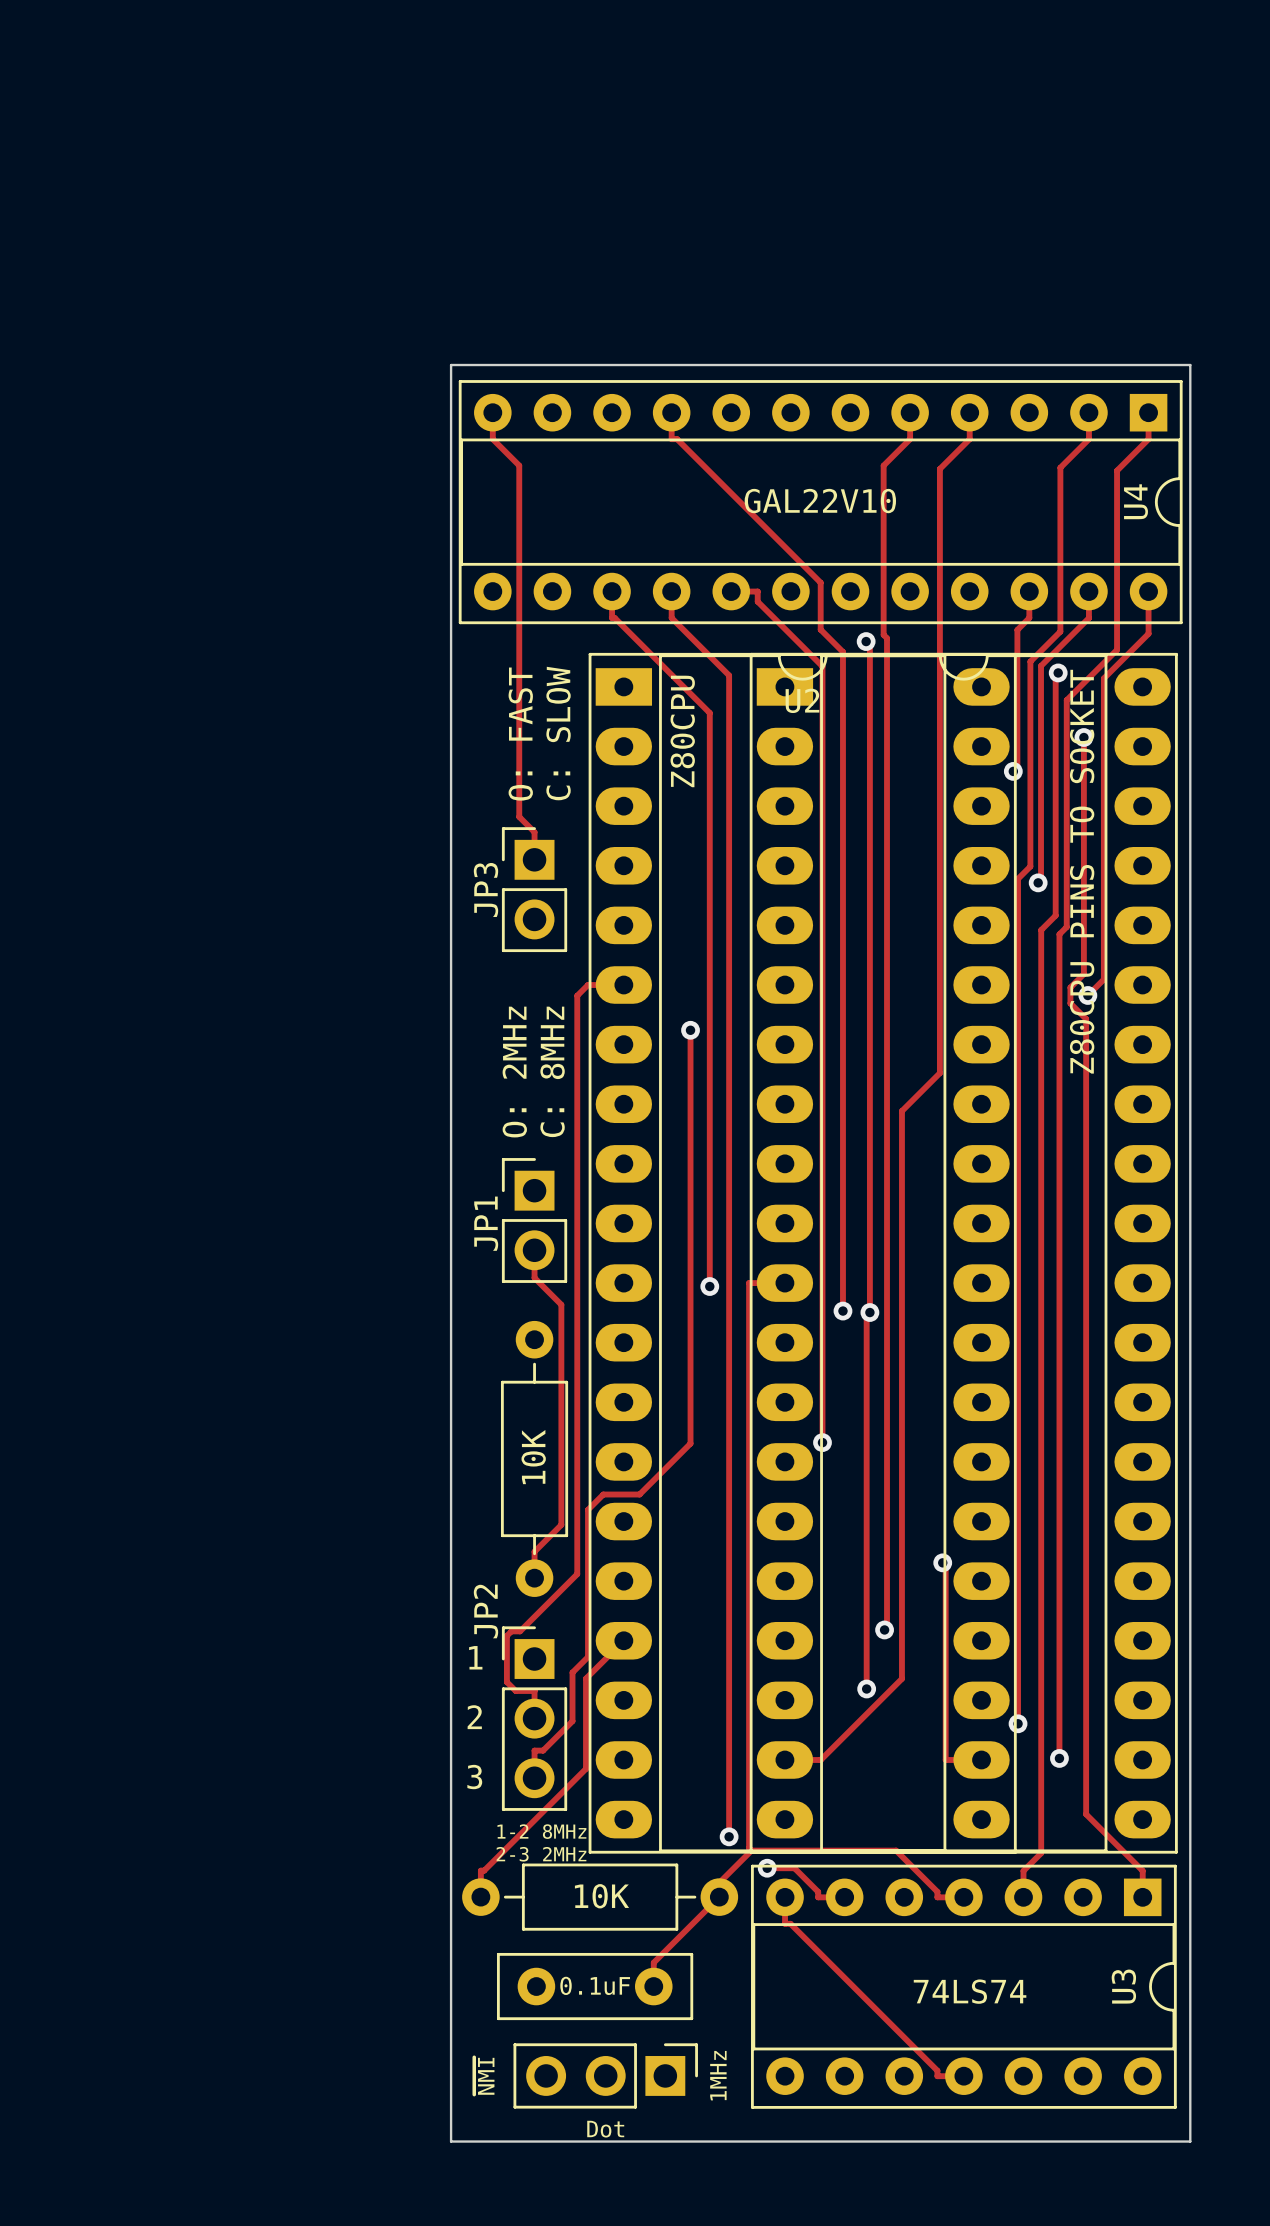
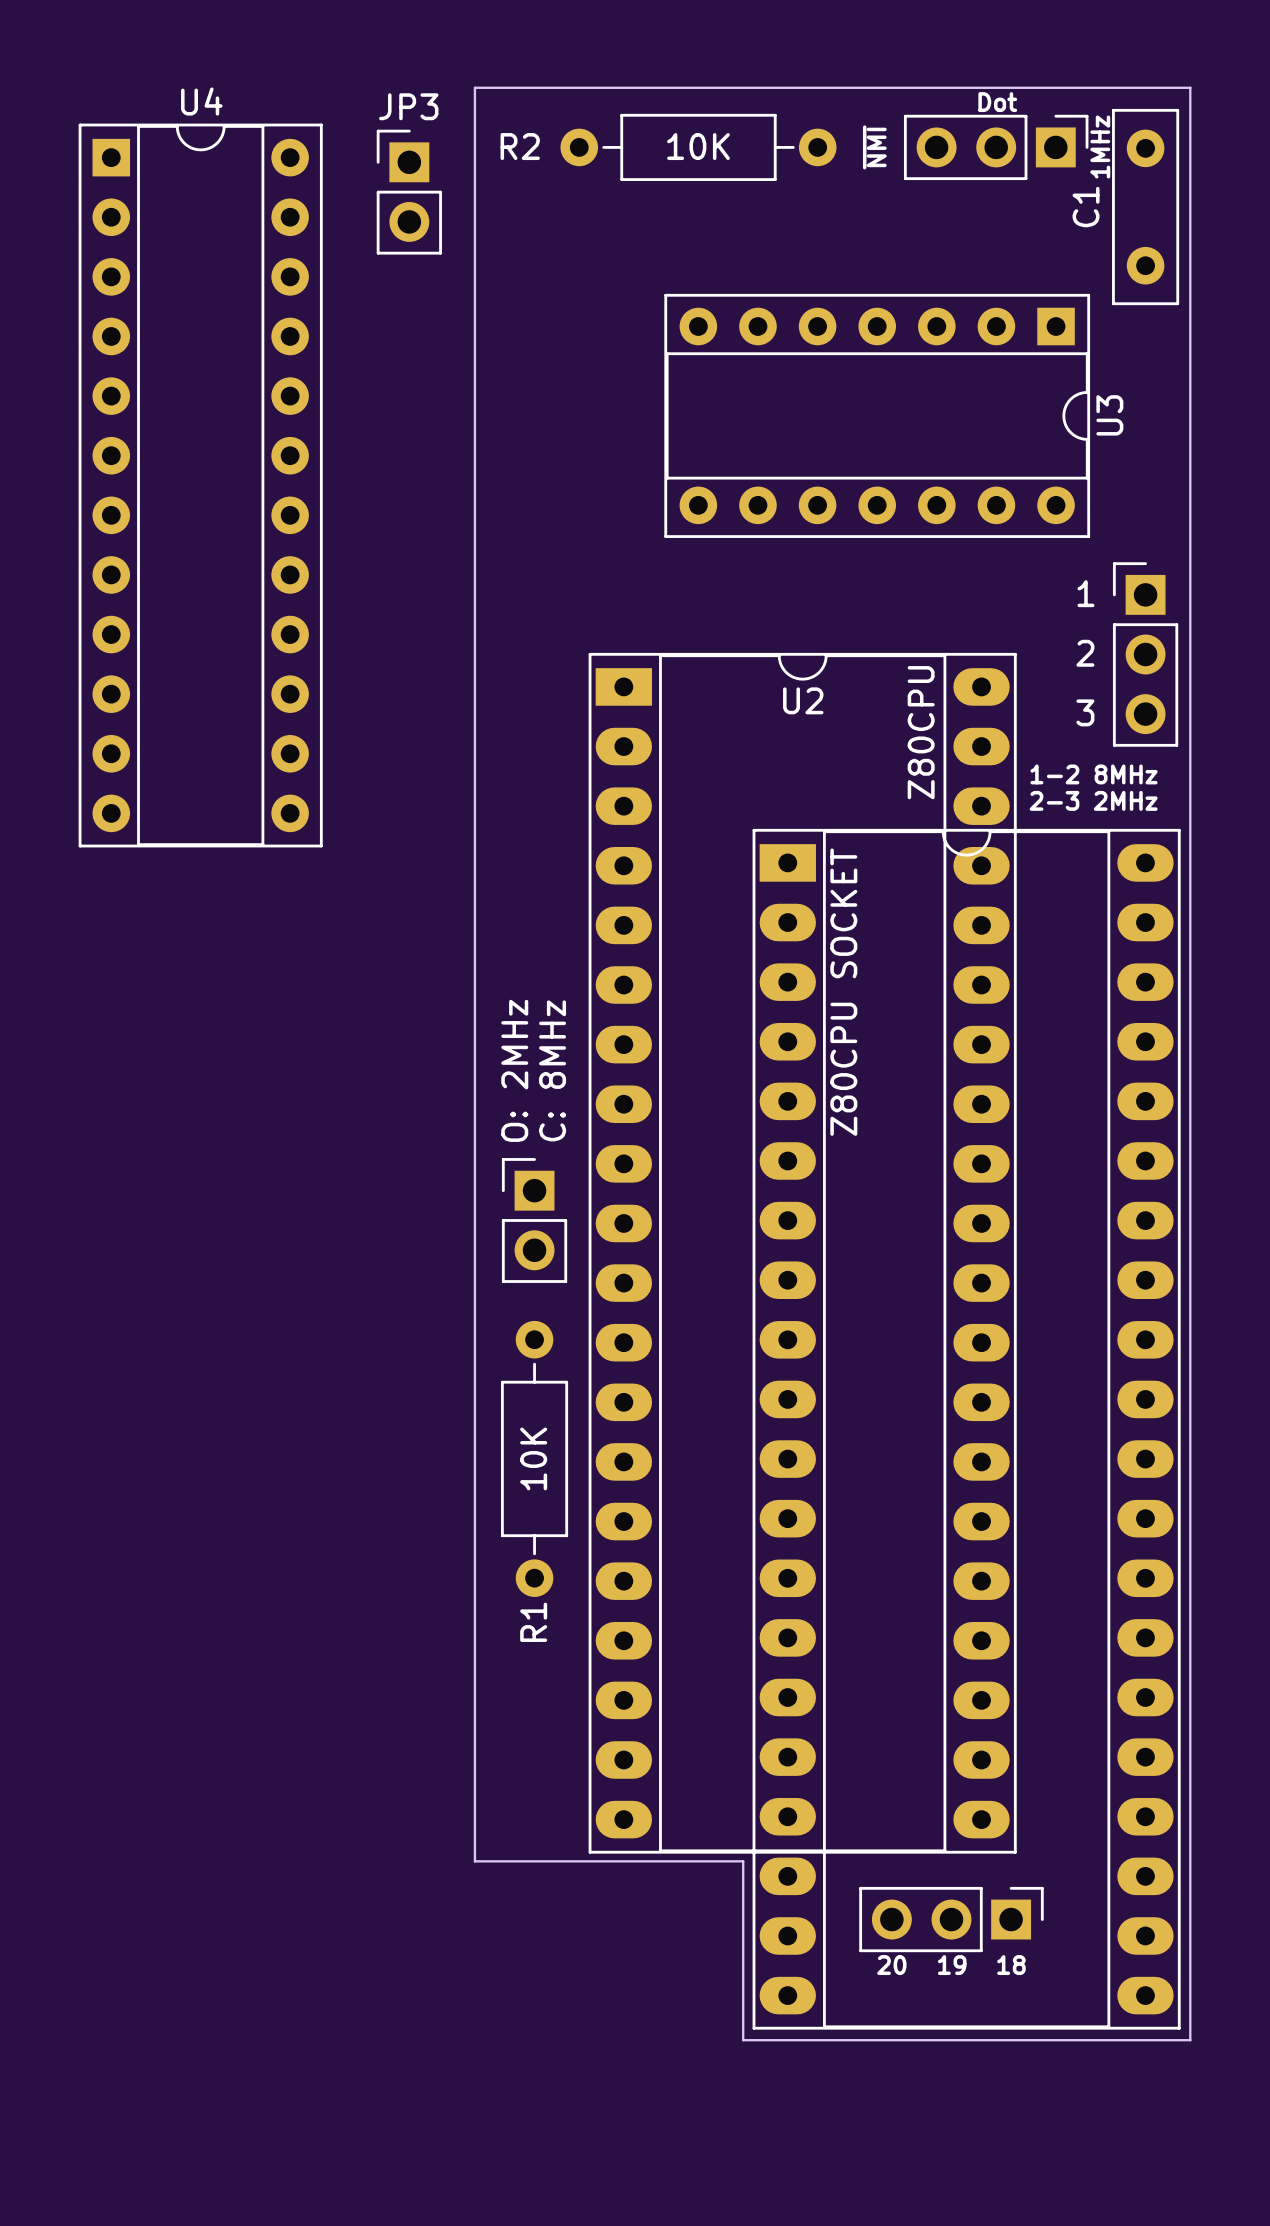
text: none -> Dot (997, 102)
R2: none -> 10K (698, 147)
text: none -> ~{NMI} (874, 147)
part: none -> (996, 147)
text: none -> 1MHz (1100, 147)
C1: none -> (1145, 207)
board edge: (1190, 365) (451, 365) (451, 2141) (1190, 2141) (1190, 2040) -> (1190, 365) (1190, 87) (474, 87) (474, 1861) (743, 1861) (743, 2040) (1190, 2040)
track: (492, 412) (492, 439) (519, 465) (519, 816) (534, 832) (534, 859) -> none
track: (671, 412) (671, 439) (677, 439) (820, 582) (820, 629) (842, 651) (842, 1311) -> none
track: (910, 412) (910, 439) (883, 465) (883, 634) (887, 638) (887, 1627) (884, 1629) -> none
track: (969, 412) (969, 439) (939, 468) (939, 1073) (901, 1111) (901, 1678) (820, 1759) (784, 1759) -> none
track: (1088, 412) (1088, 439) (1060, 467) (1060, 631) (1030, 661) (1030, 866) (1018, 878) (1018, 1723) -> none
track: (1148, 412) (1148, 439) (1117, 470) (1117, 649) (1066, 700) (1066, 927) (1059, 934) (1059, 1758) -> none
U4 value: GAL22V10 (820, 501) -> none
U4 name position: U4 (1136, 501) -> U4 (201, 101)
U4 rotation: 0° (820, 502) -> 90° counterclockwise (200, 485)
U4 position: (820, 502) -> (200, 485)
track: (612, 591) (612, 618) (614, 618) (709, 713) (709, 1286) -> none
track: (671, 591) (671, 618) (729, 675) (729, 1836) -> none
track: (731, 591) (757, 591) (757, 601) (822, 666) (822, 1442) -> none
track: (1029, 591) (1029, 618) (1017, 629) (1017, 767) (1013, 771) -> none
track: (1088, 591) (1088, 618) (1041, 666) (1041, 880) (1038, 882) -> none
track: (1148, 591) (1148, 633) (1103, 678) (1103, 979) (1087, 995) -> none
text: none -> 1 (1085, 593)
track: (866, 641) (869, 645) (869, 1312) (866, 1315) (866, 1688) -> none
via: (866, 641) -> none
text: none -> 2 (1085, 653)
part: none -> (1145, 654)
track: (1058, 672) (1055, 675) (1055, 915) (1041, 930) (1041, 1853) (1023, 1870) (1023, 1897) -> none
via: (1058, 672) -> none
text: none -> 3 (1085, 712)
U2 value position: Z80CPU (682, 731) -> Z80CPU (921, 732)
text: C: SLOW (558, 733) -> none
text: O: FAST (520, 734) -> none
track: (1083, 737) (1083, 974) (1070, 987) (1070, 1003) (1086, 1019) (1086, 1814) (1142, 1870) (1142, 1897) -> none
via: (1083, 737) -> none
via: (1013, 771) -> none
text: none -> 1-2 8MHz (1094, 774)
text: none -> 2-3 2MHz (1093, 800)
via: (1038, 882) -> none
JP3 name rotation: 0° (485, 889) -> 90° clockwise (408, 106)
JP3 name position: JP3 (485, 889) -> JP3 (408, 106)
JP3 position: (534, 889) -> (409, 192)
track: (623, 985) (588, 985) (577, 995) (577, 1574) (520, 1631) (511, 1631) (506, 1635) (506, 1682) (515, 1690) (534, 1690) (534, 1718) -> none
via: (1087, 995) -> none
track: (690, 1030) (690, 1443) (639, 1494) (603, 1494) (588, 1509) (588, 1657) (572, 1672) (572, 1721) (543, 1750) (534, 1750) (534, 1778) -> none
via: (690, 1030) -> none
JP1 name: JP1 (486, 1223) -> none
track: (534, 1250) (534, 1277) (561, 1304) (561, 1524) (534, 1551) (534, 1578) -> none
part: Z80CPU PINS TO SOCKET (963, 1253) -> none
track: (784, 1283) (749, 1283) (749, 1848) (751, 1850) -> none
via: (709, 1286) -> none
via: (842, 1311) -> none
via: (869, 1312) -> none
part: none -> Z80CPU SOCKET (966, 1429)
via: (822, 1442) -> none
track: (942, 1562) (945, 1565) (945, 1759) (981, 1759) -> none
via: (942, 1562) -> none
R1 name: none -> R1 (533, 1622)
via: (884, 1629) -> none
track: (623, 1640) (585, 1678) (585, 1768) (484, 1870) (480, 1870) (480, 1897) -> none
text: 1 (475, 1657) -> none
via: (866, 1688) -> none
text: 2 (474, 1717) -> none
JP2: (534, 1718) -> none
via: (1018, 1723) -> none
via: (1059, 1758) -> none
text: 3 (474, 1777) -> none
text: 1-2 8MHz (541, 1831) -> none
via: (729, 1836) -> none
track: (751, 1850) (896, 1850) (937, 1891) (937, 1897) (963, 1897) -> none
track: (751, 1850) (719, 1882) (719, 1897) (653, 1962) (653, 1986) -> none
text: 2-3 2MHz (541, 1854) -> none
track: (767, 1868) (794, 1868) (818, 1891) (818, 1897) (844, 1897) -> none
via: (767, 1868) -> none
part: 10K (600, 1897) -> none
track: (785, 1897) (785, 1923) (790, 1923) (937, 2070) (937, 2076) (963, 2076) -> none
text: none -> 20 (891, 1965)
text: none -> 19 (952, 1965)
text: none -> 18 (1011, 1965)
part: 0.1uF (595, 1986) -> none
U3 position: (963, 1986) -> (877, 415)
U3 name position: U3 (1123, 1986) -> U3 (1109, 415)
U3 value: 74LS74 (970, 1991) -> none
part position: (605, 2075) -> (951, 1919)
text: 1MHz (718, 2075) -> none
text: ~{NMI} (484, 2076) -> none
text: Dot (605, 2129) -> none

